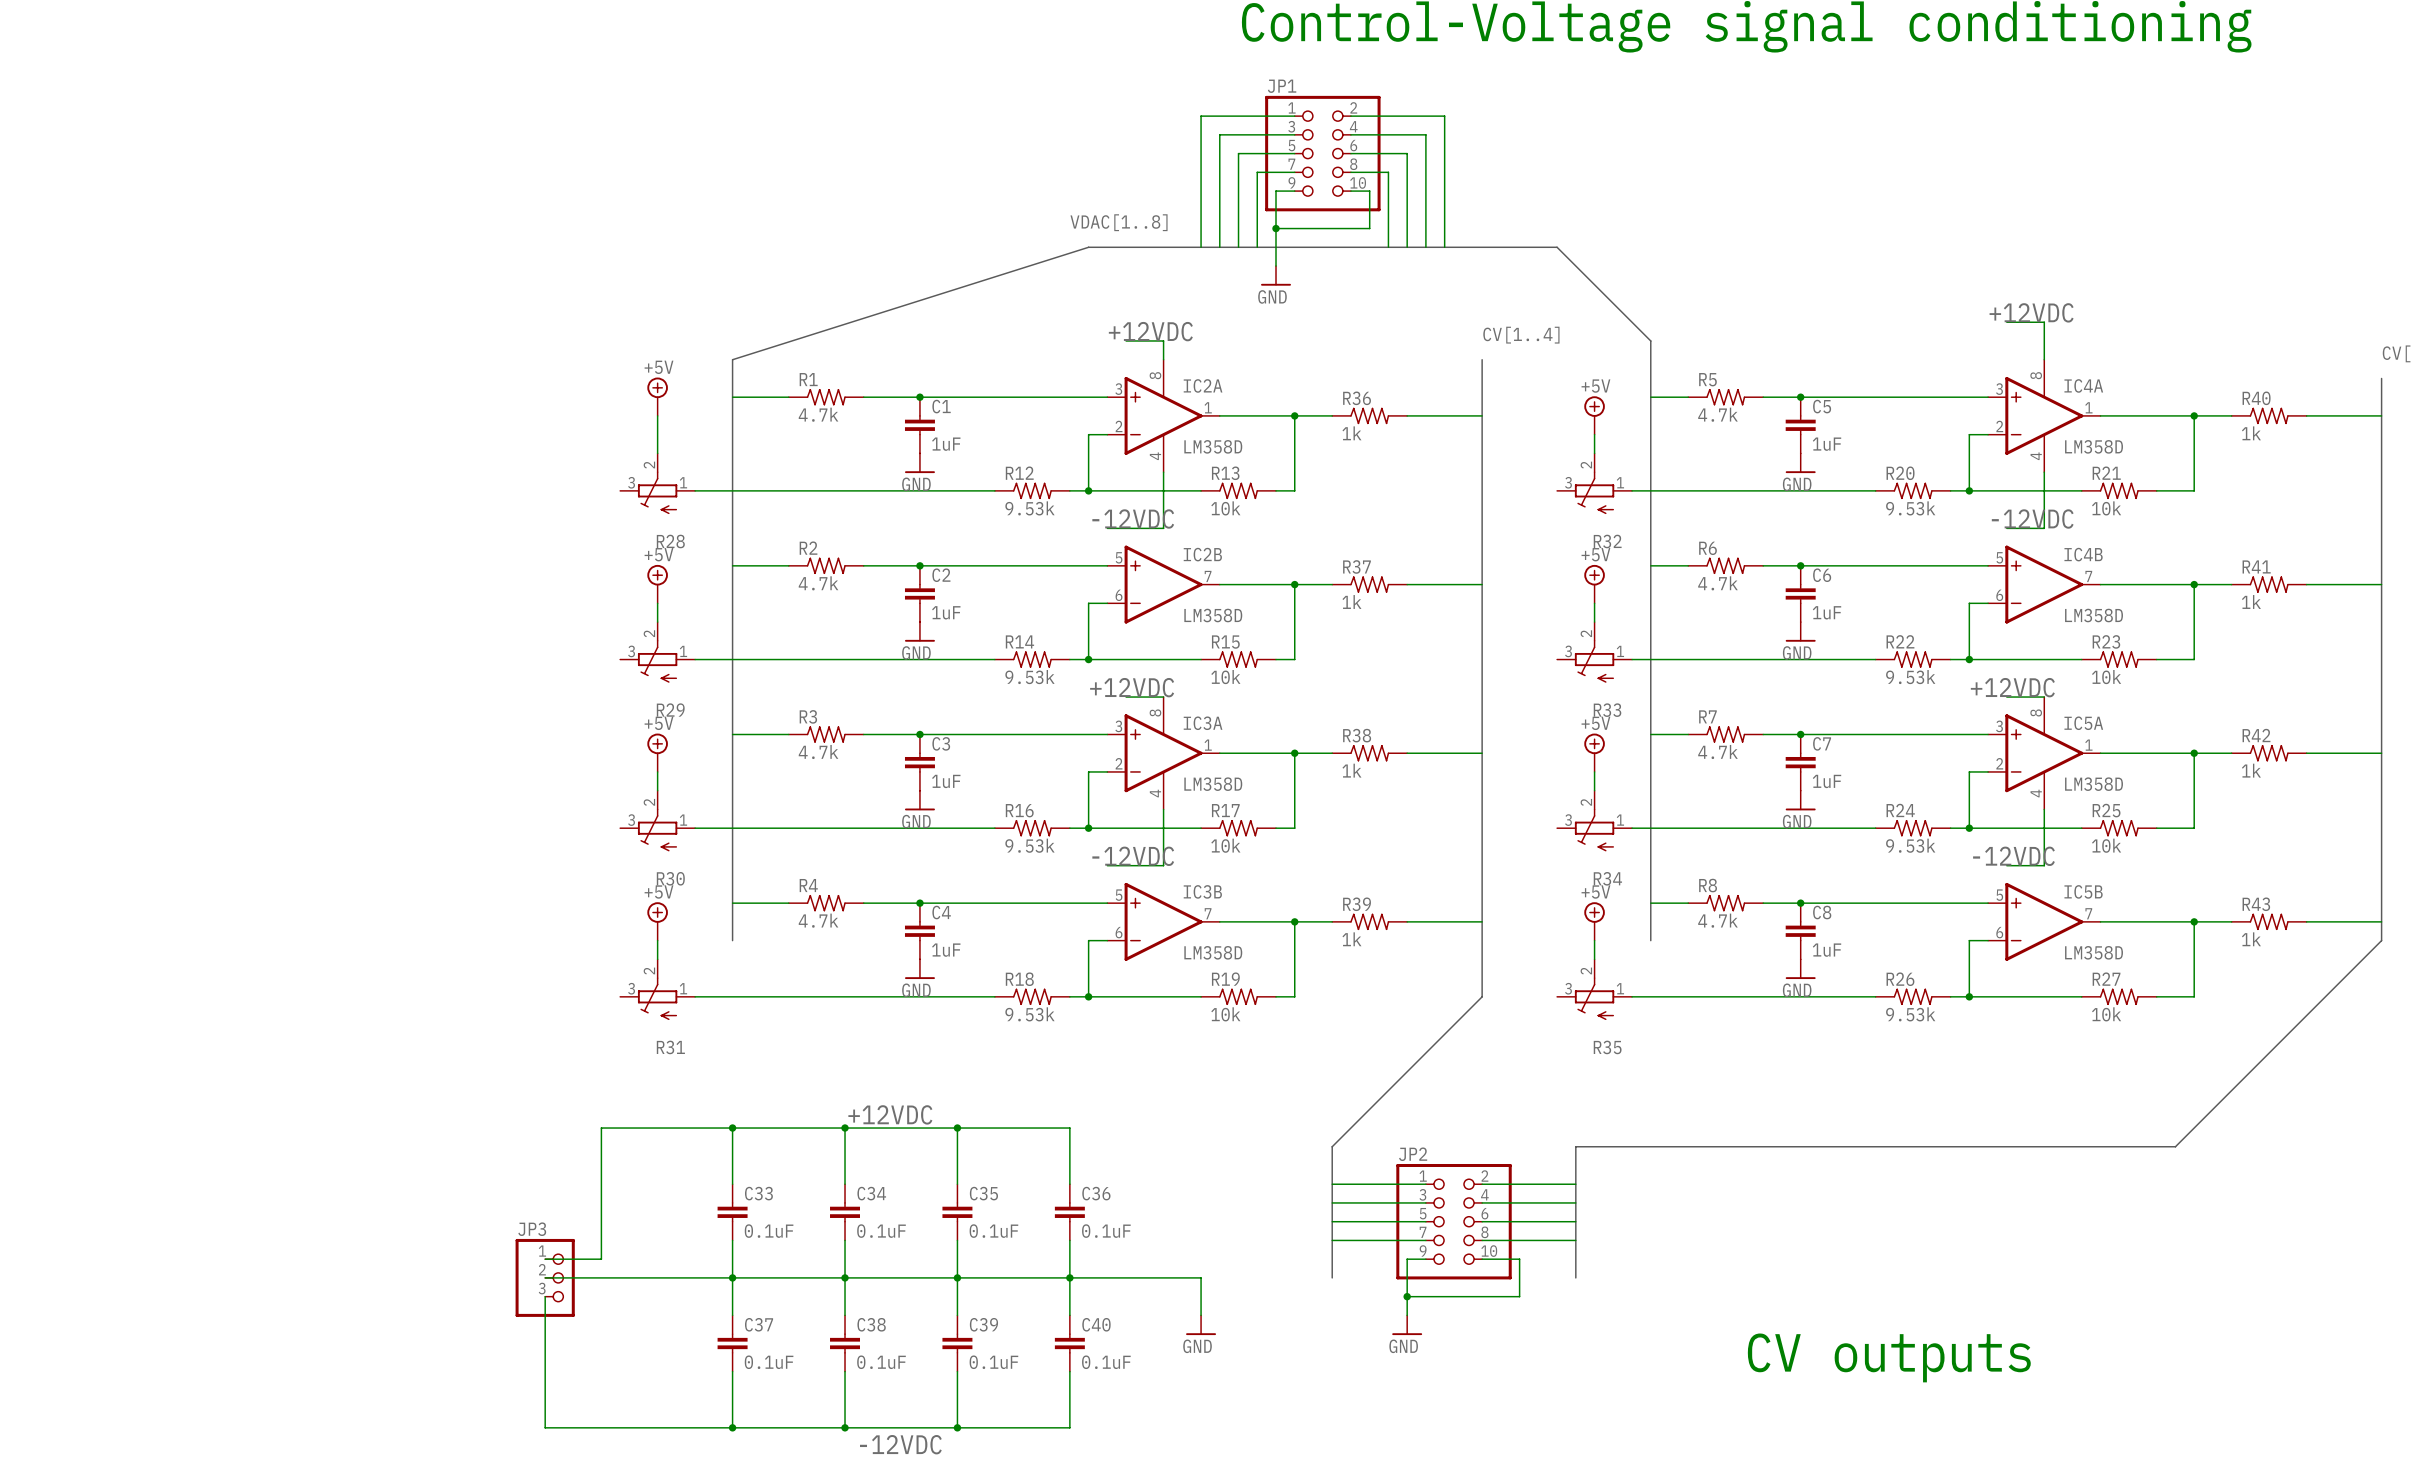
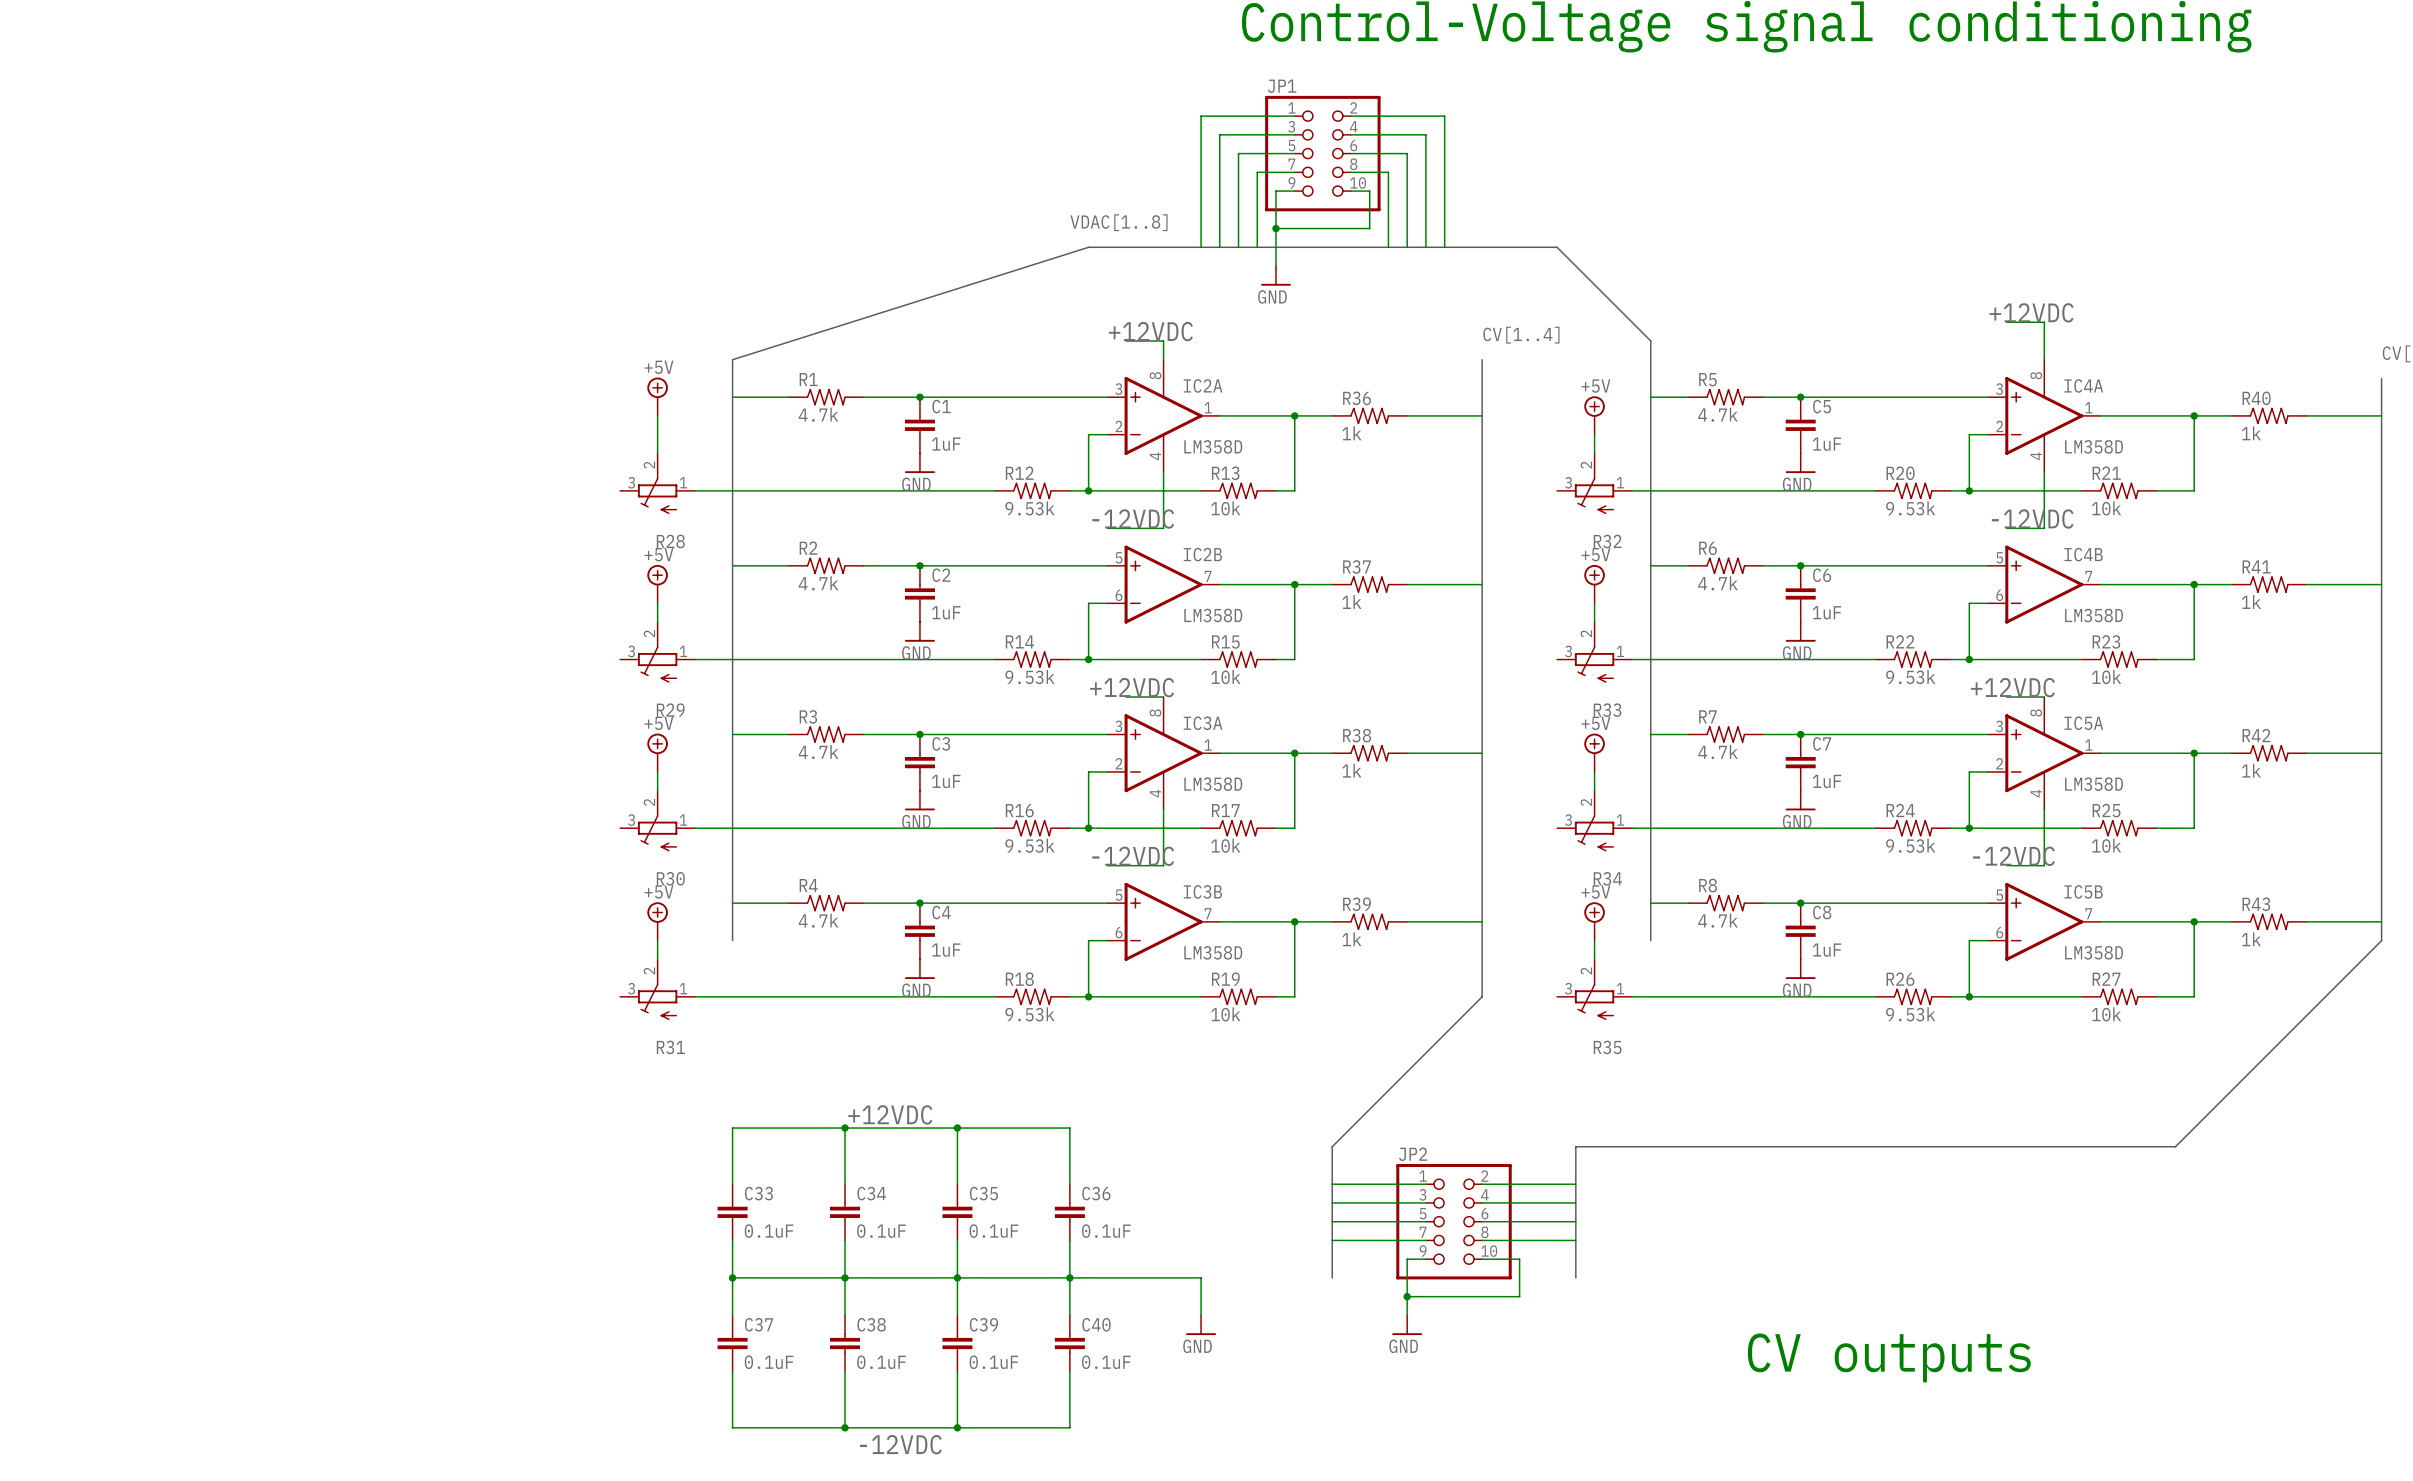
wire: (732, 1128) (601, 1128) (601, 1259) (545, 1259) -> none
junction: (732, 1128) -> none
wire: (545, 1277) (732, 1277) -> none
JP3: (545, 1277) -> none
wire: (545, 1296) (545, 1427) (732, 1427) -> none
junction: (732, 1427) -> none

